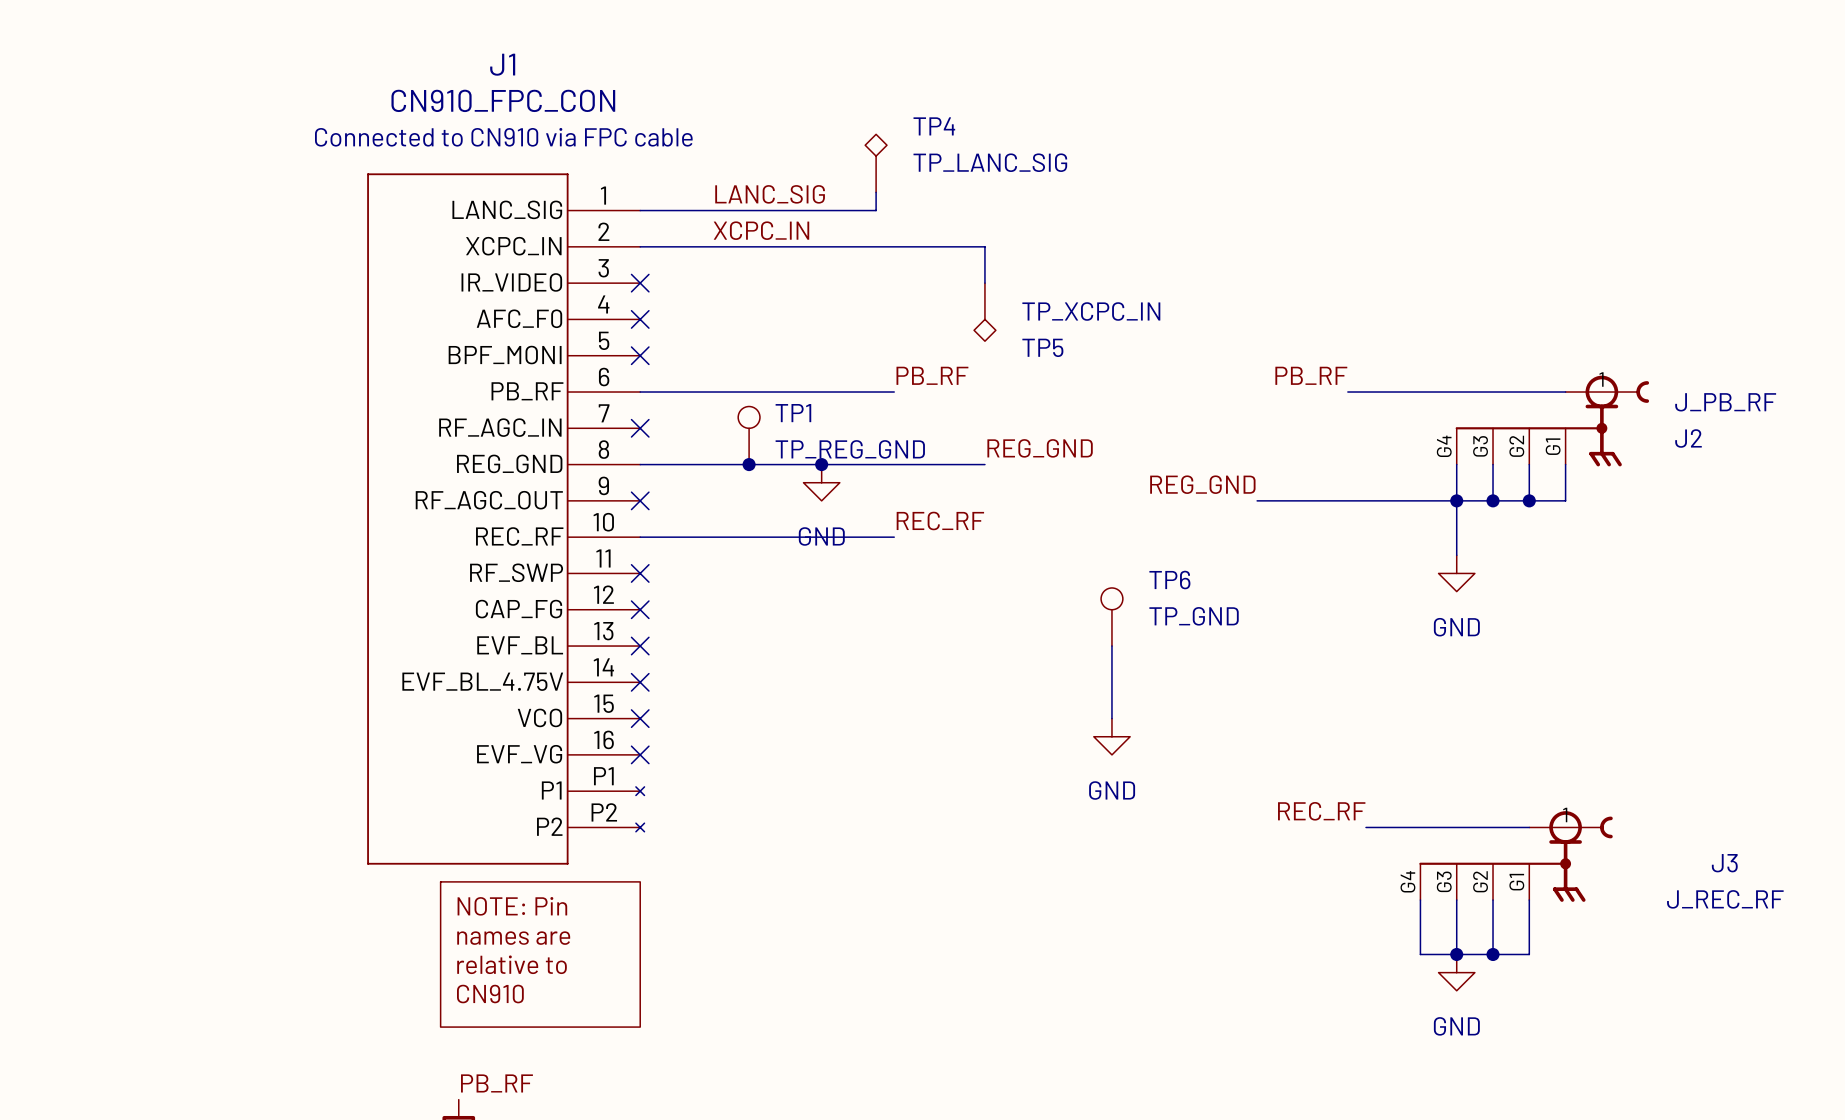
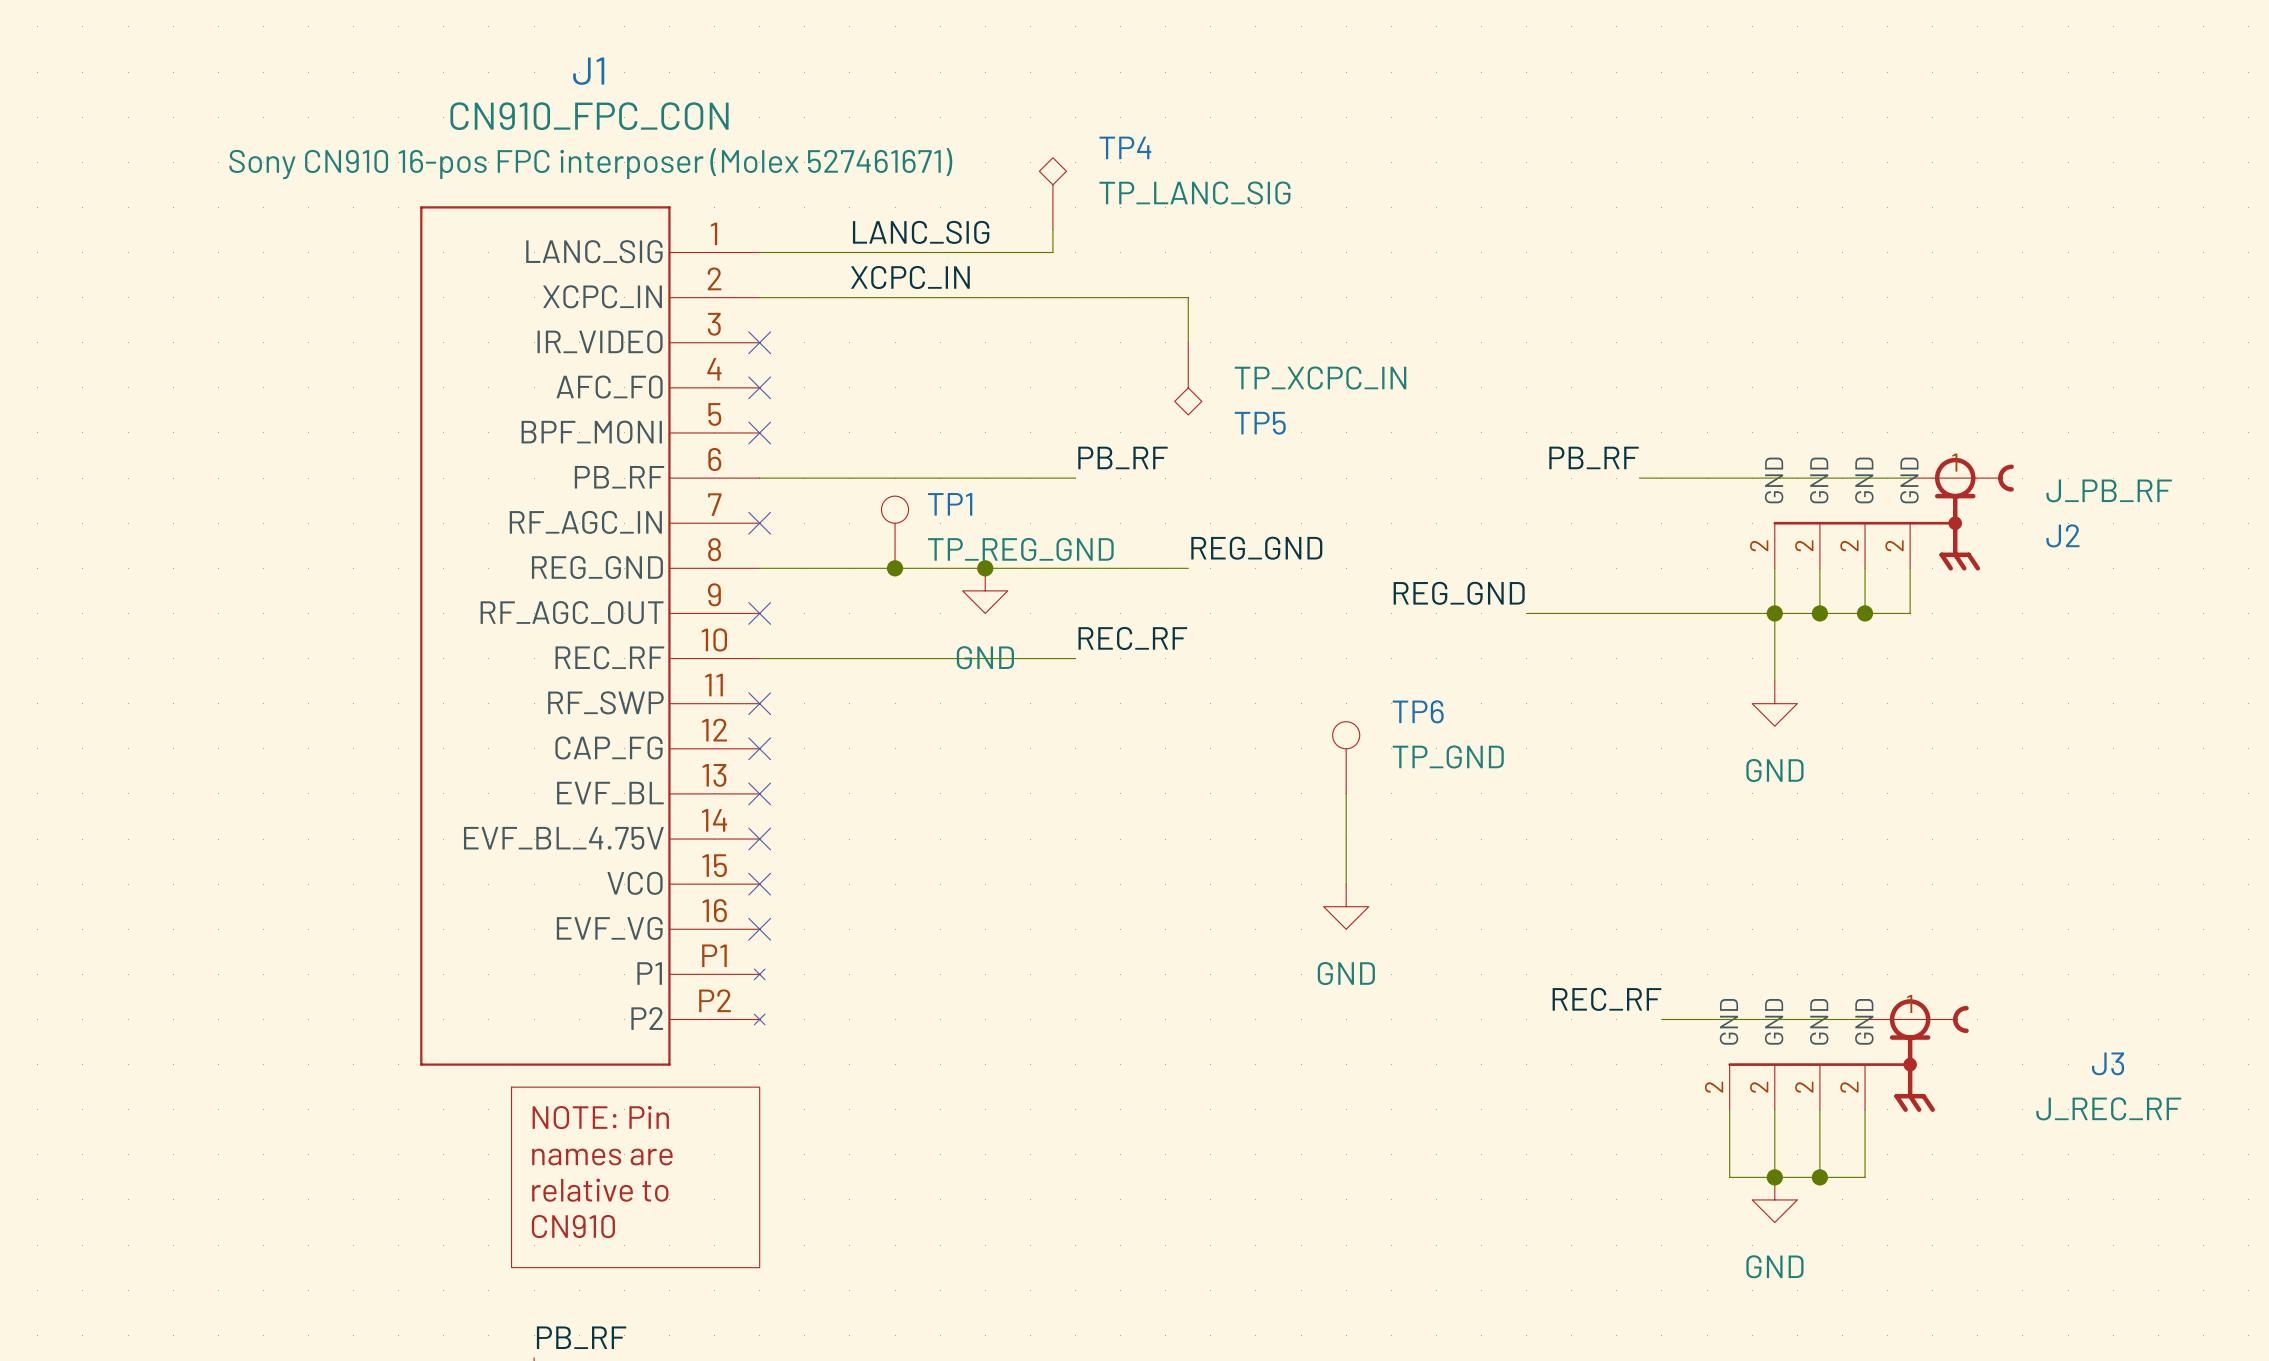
J1 text: Connected to CN910 via FPC cable (503, 137) -> Sony CN910 16-pos FPC interposer (Molex 527461671) (590, 163)
J2 pin name: none -> GND (1774, 480)
J2 pin name: none -> GND (1819, 480)
J2 pin name: none -> GND (1864, 480)
J2 pin name: none -> GND (1909, 480)
J2 pin number: G4 (1444, 446) -> 2 (1759, 545)
J2 pin number: G3 (1480, 446) -> 2 (1804, 545)
J2 pin number: G2 (1516, 446) -> 2 (1849, 545)
J2 pin number: G1 (1553, 446) -> 2 (1894, 545)
J3 pin name: none -> GND (1728, 1021)
J3 pin name: none -> GND (1774, 1021)
J3 pin name: none -> GND (1819, 1021)
J3 pin name: none -> GND (1864, 1021)
J3 pin number: G4 (1407, 881) -> 2 (1714, 1087)
J3 pin number: G3 (1444, 881) -> 2 (1759, 1087)
J3 pin number: G2 (1480, 881) -> 2 (1804, 1087)
J3 pin number: G1 (1516, 882) -> 2 (1849, 1087)

